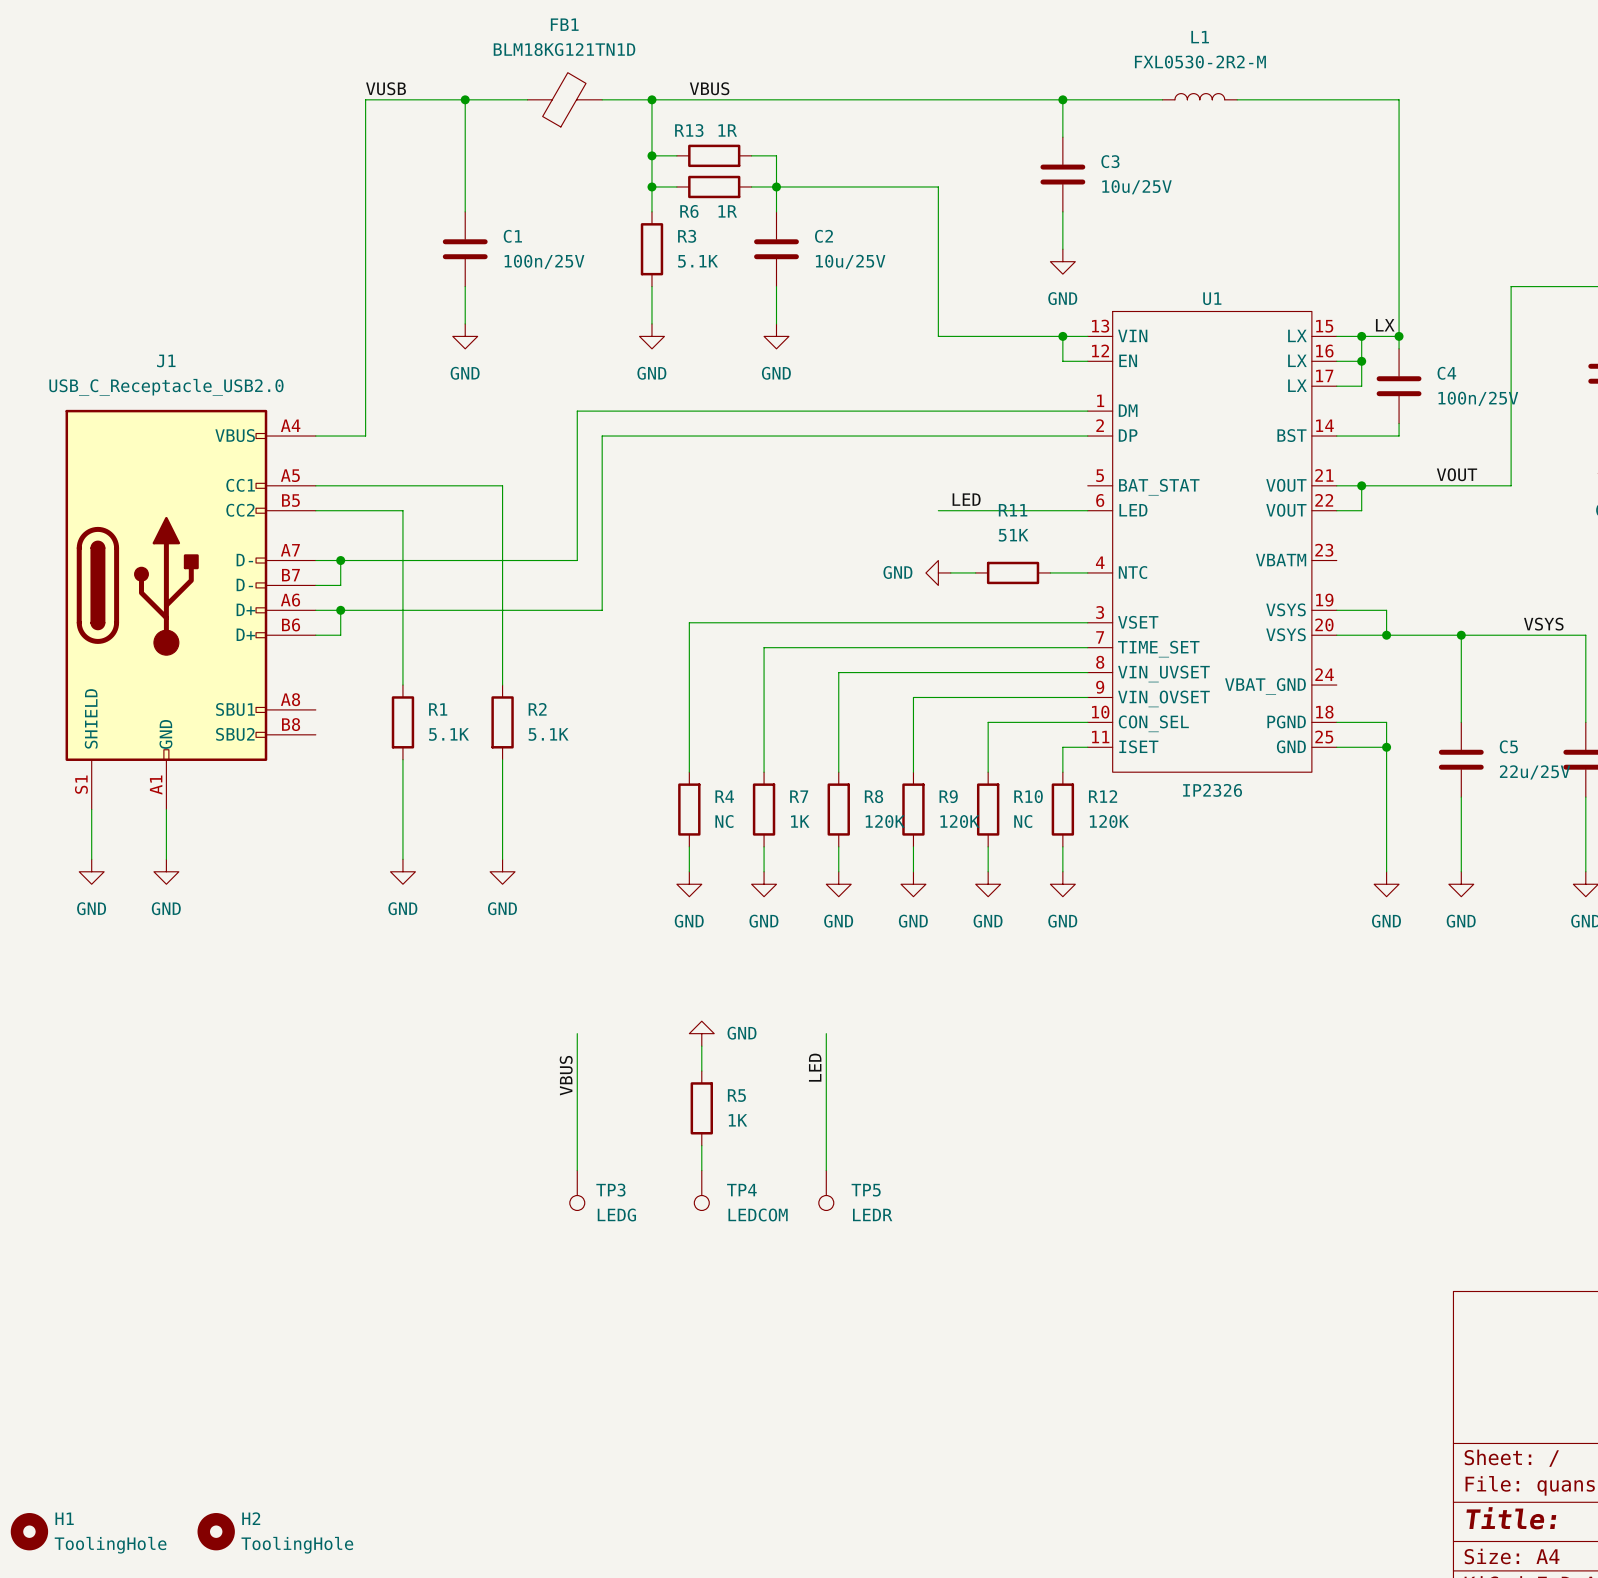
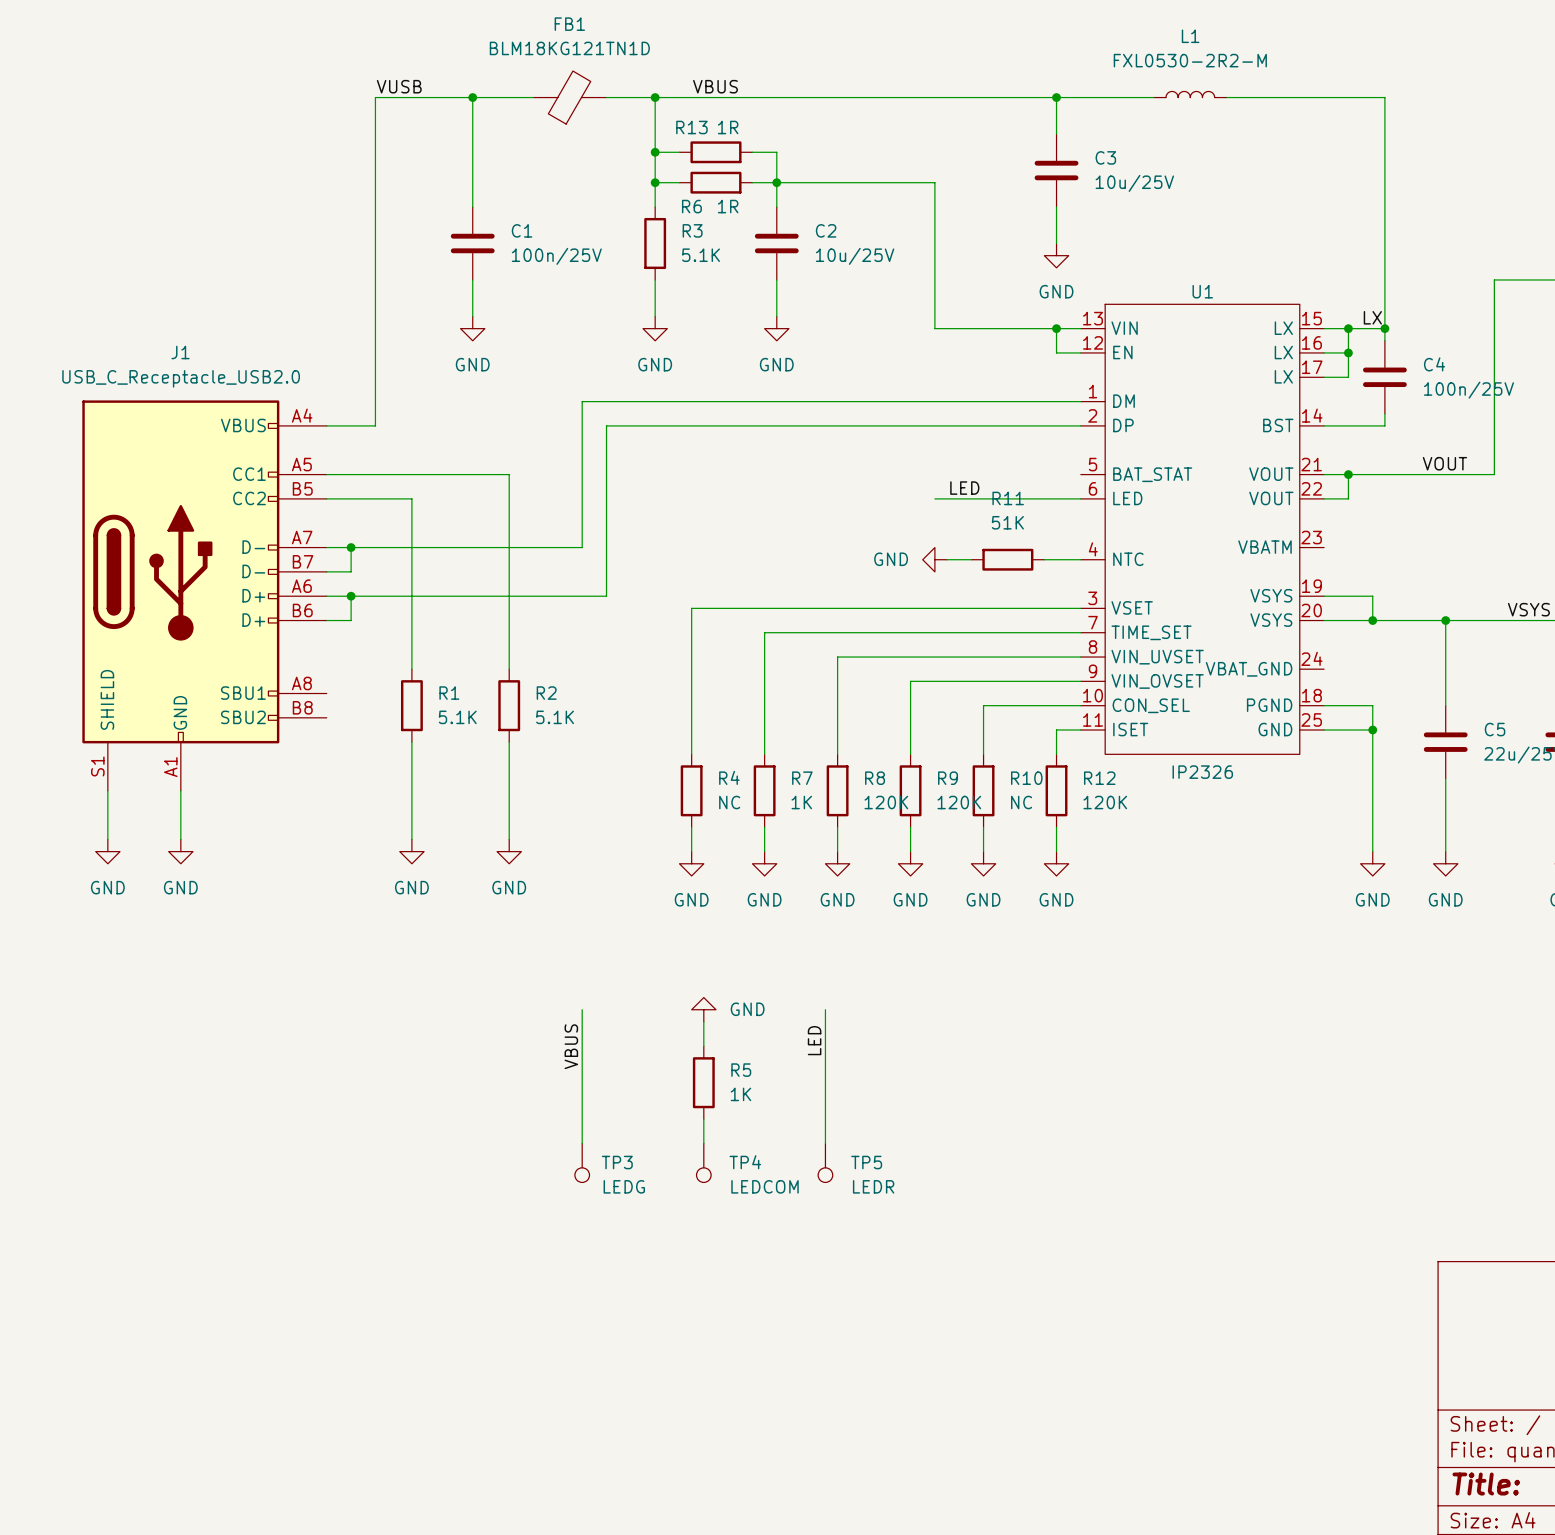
H1: ToolingHole (29, 1531) -> none
H2: ToolingHole (216, 1531) -> none

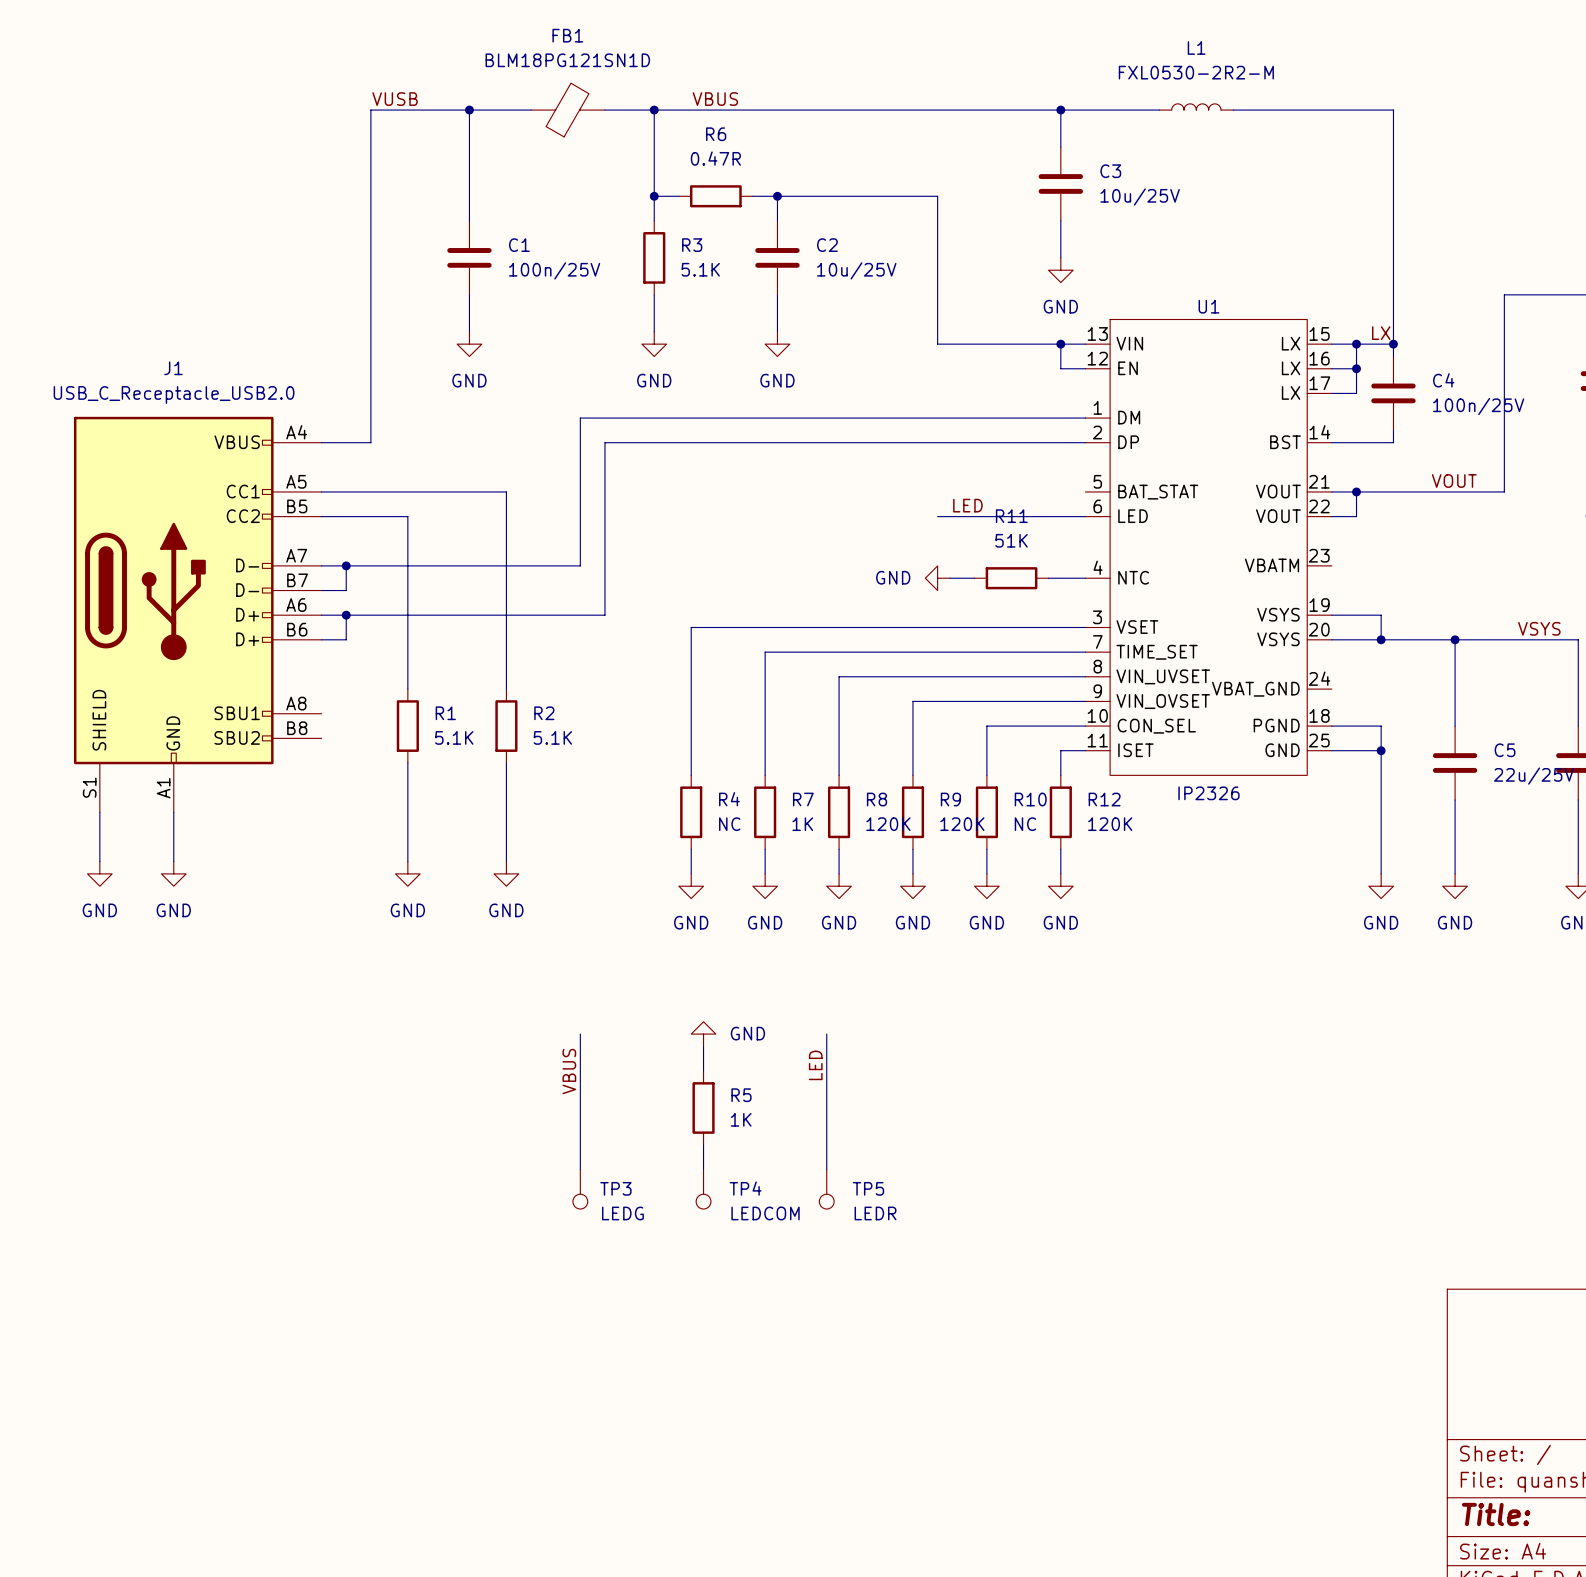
FB1 value: BLM18KG121TN1D (569, 48) -> BLM18PG121SN1D (567, 60)
wire: (655, 152) (679, 152) -> none
junction: (655, 152) -> none
R13: 1R (715, 152) -> none
wire: (752, 152) (776, 152) (776, 182) -> none
R6 name position: R6 (691, 206) -> R6 (716, 134)
R6 value: 1R (728, 206) -> 0.47R (715, 158)

